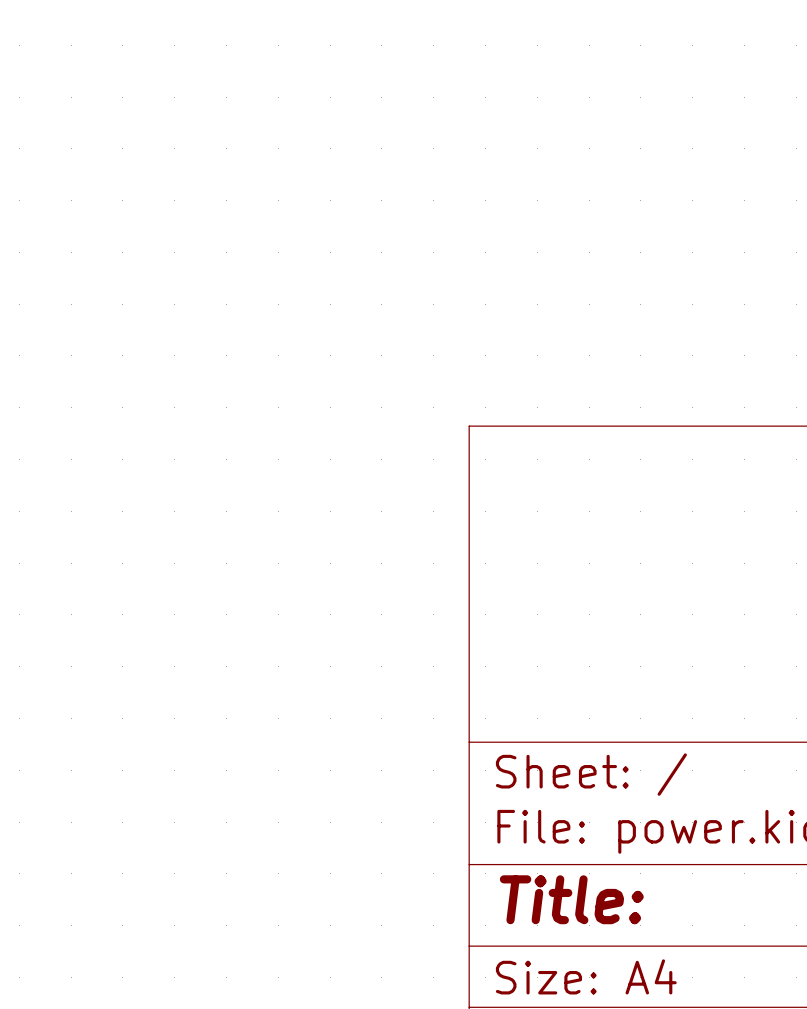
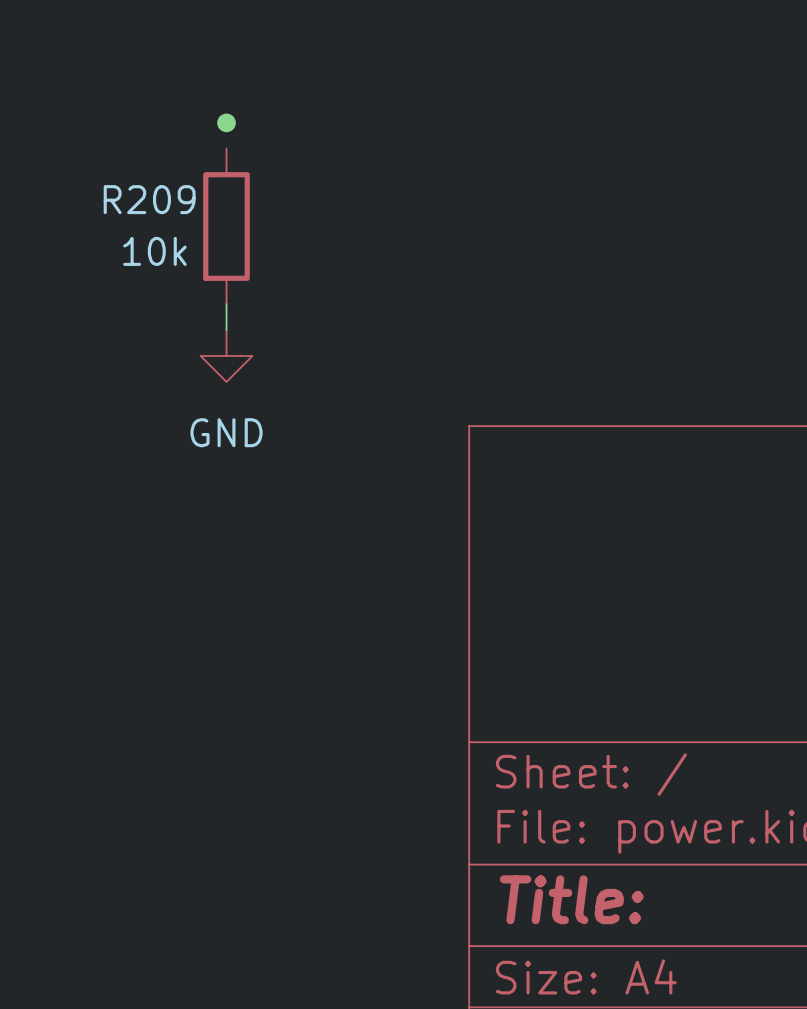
junction: none -> (226, 122)
R209: none -> 10k (226, 226)
wire: none -> (226, 304) (226, 330)
power symbol: none -> GND (226, 355)

